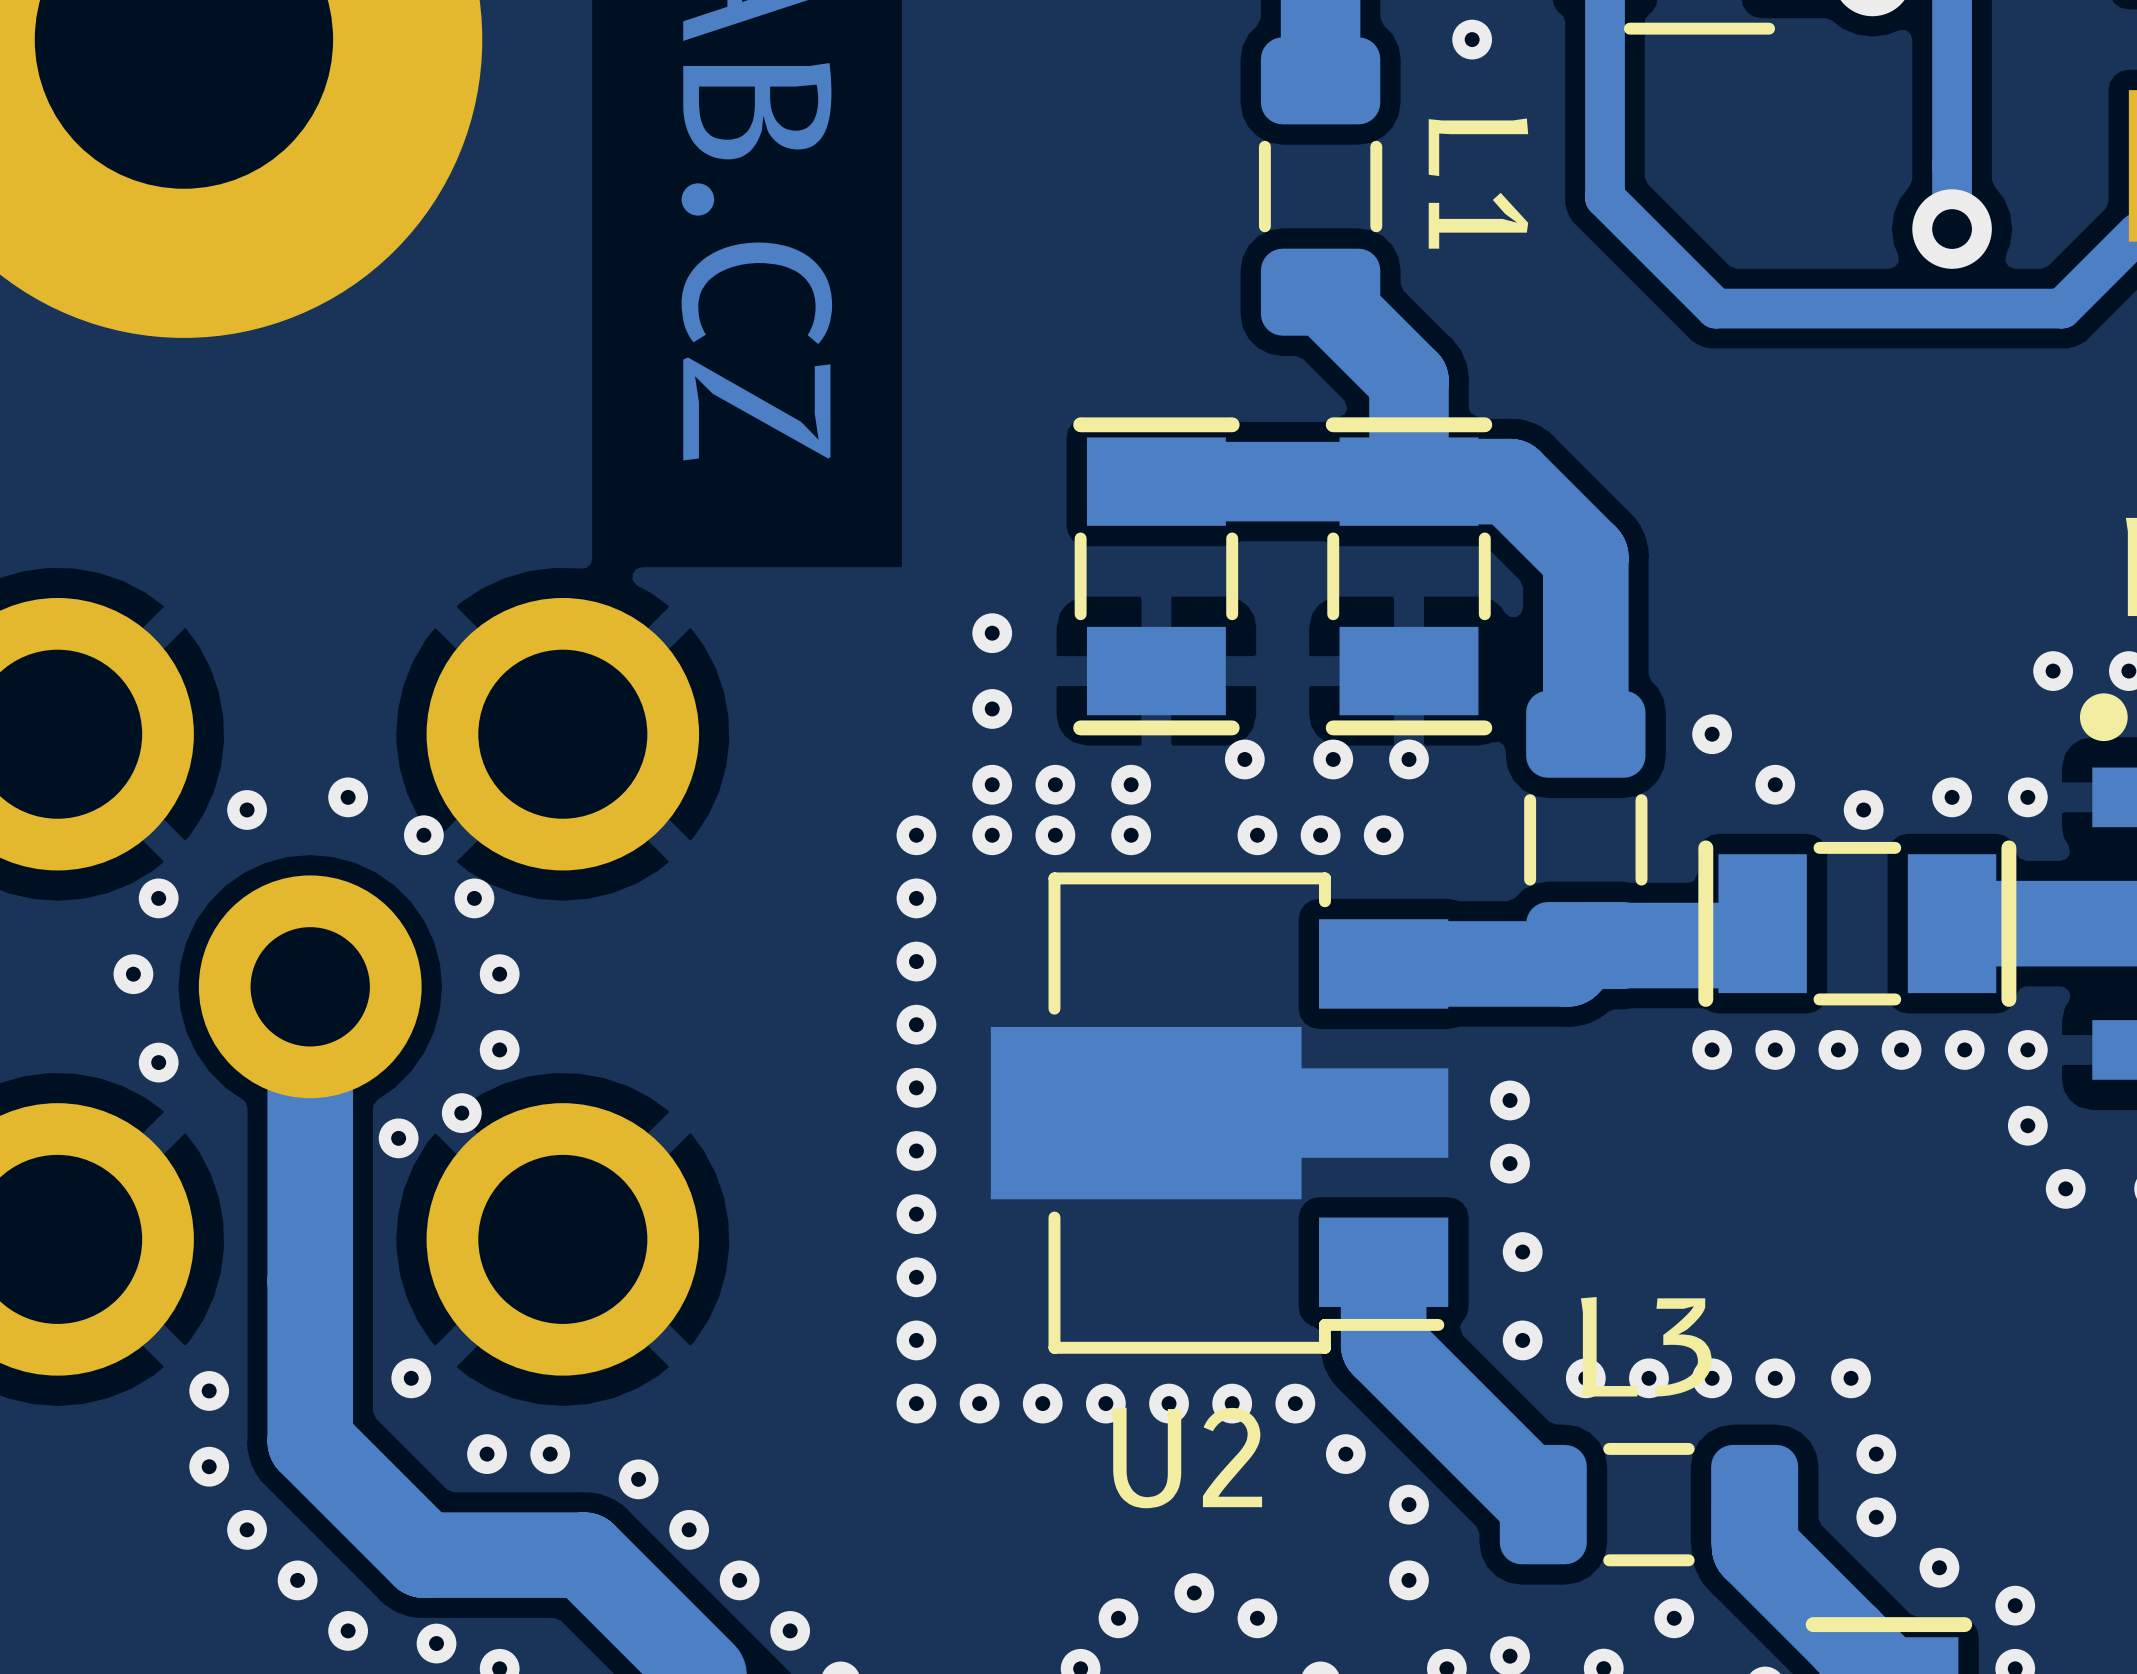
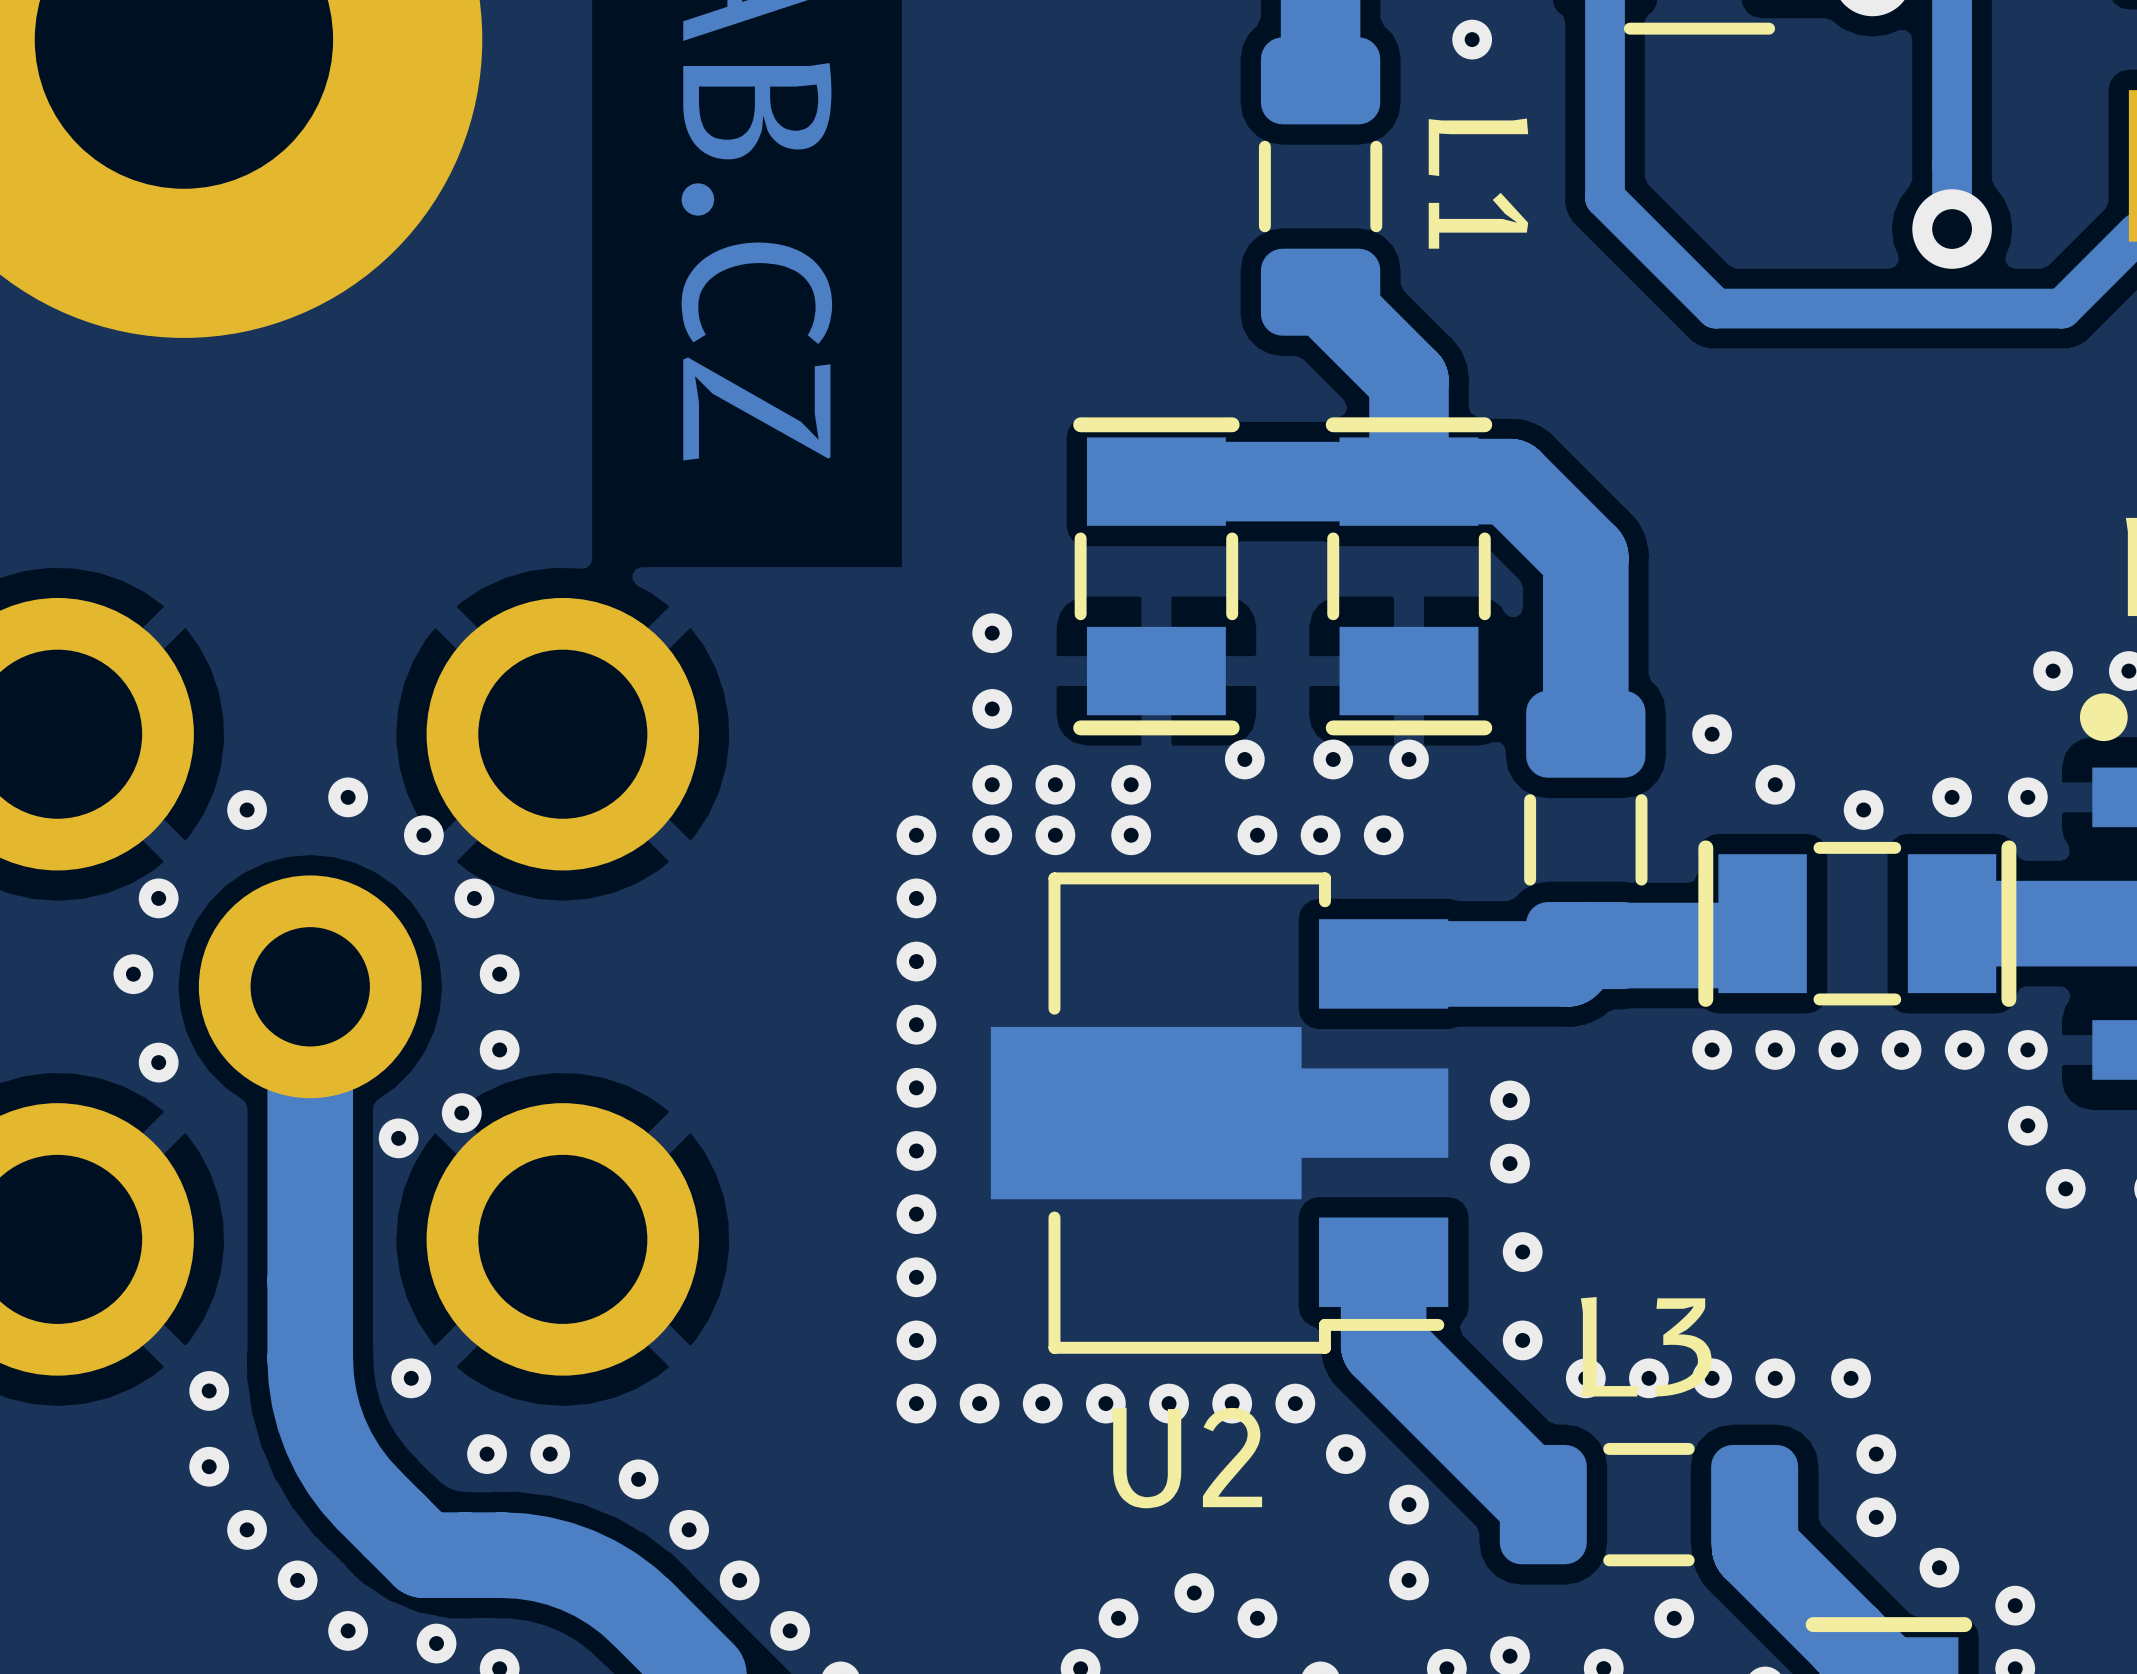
track: (310, 1359) (310, 1441) (368, 1499) -> (310, 1359) (314, 1397) (325, 1435) (343, 1469) (368, 1499)
track: (501, 1555) (584, 1555) (642, 1613) -> (501, 1555) (540, 1558) (577, 1570) (612, 1588) (642, 1613)

